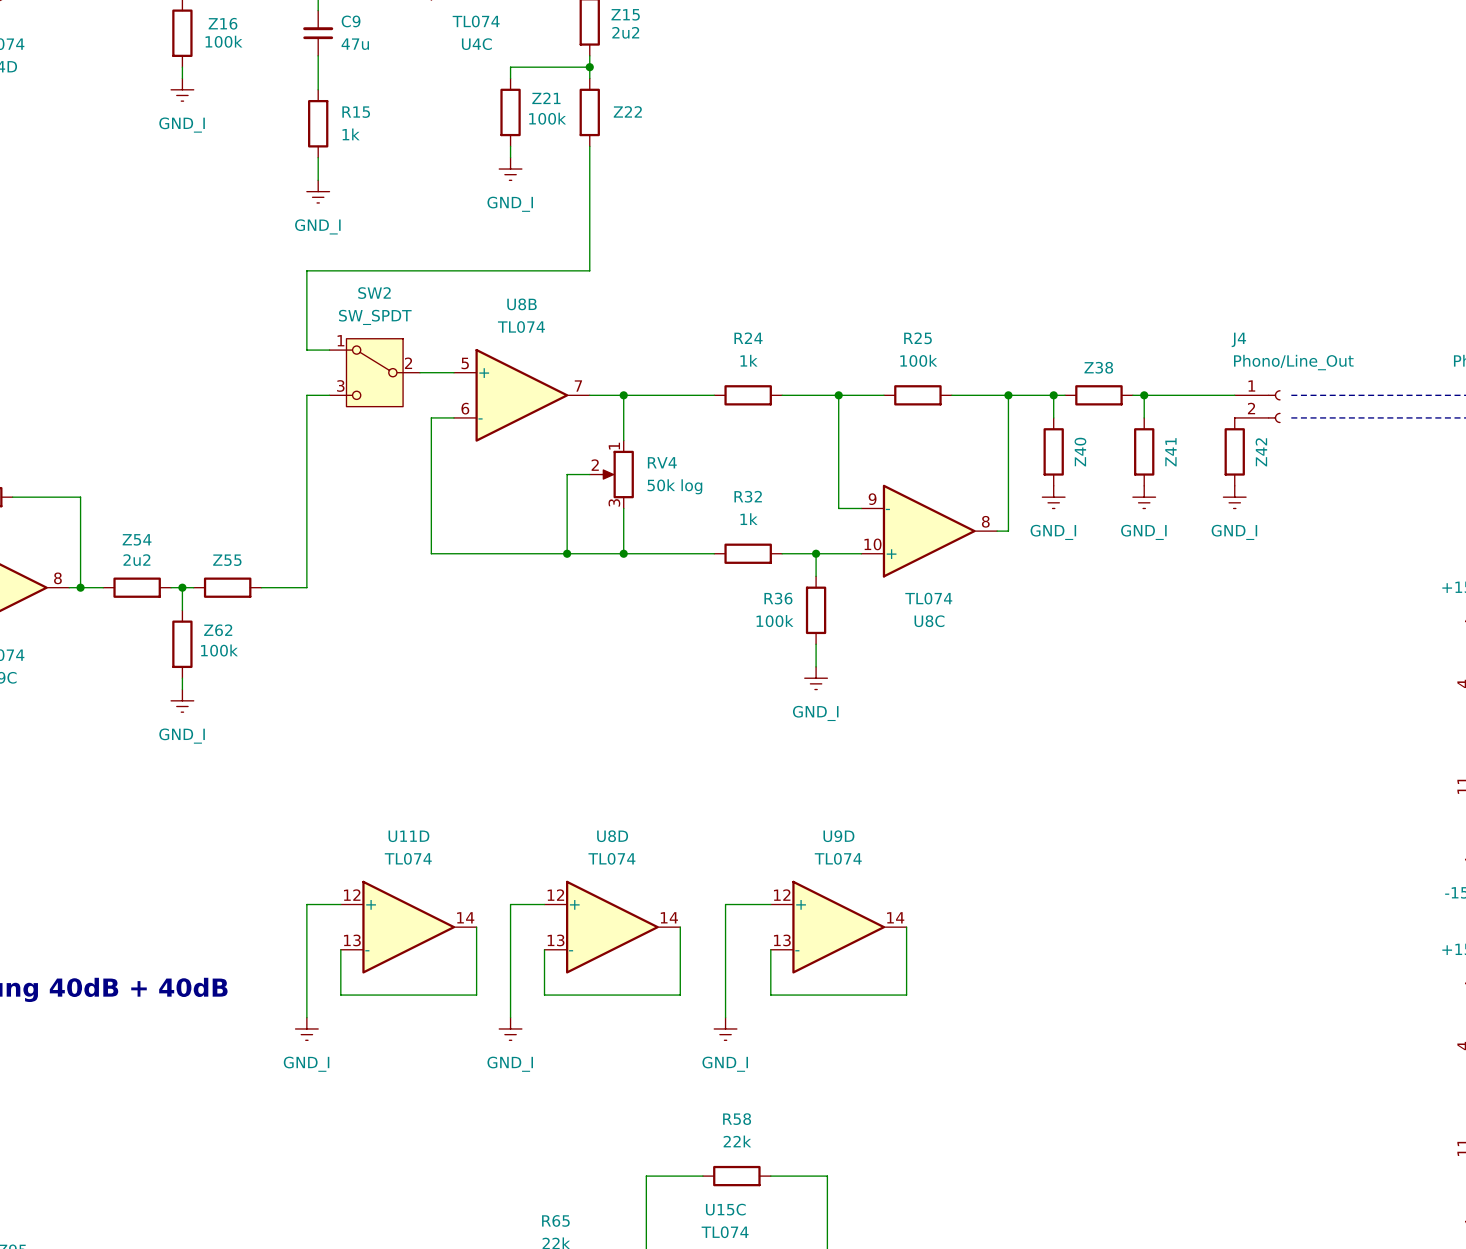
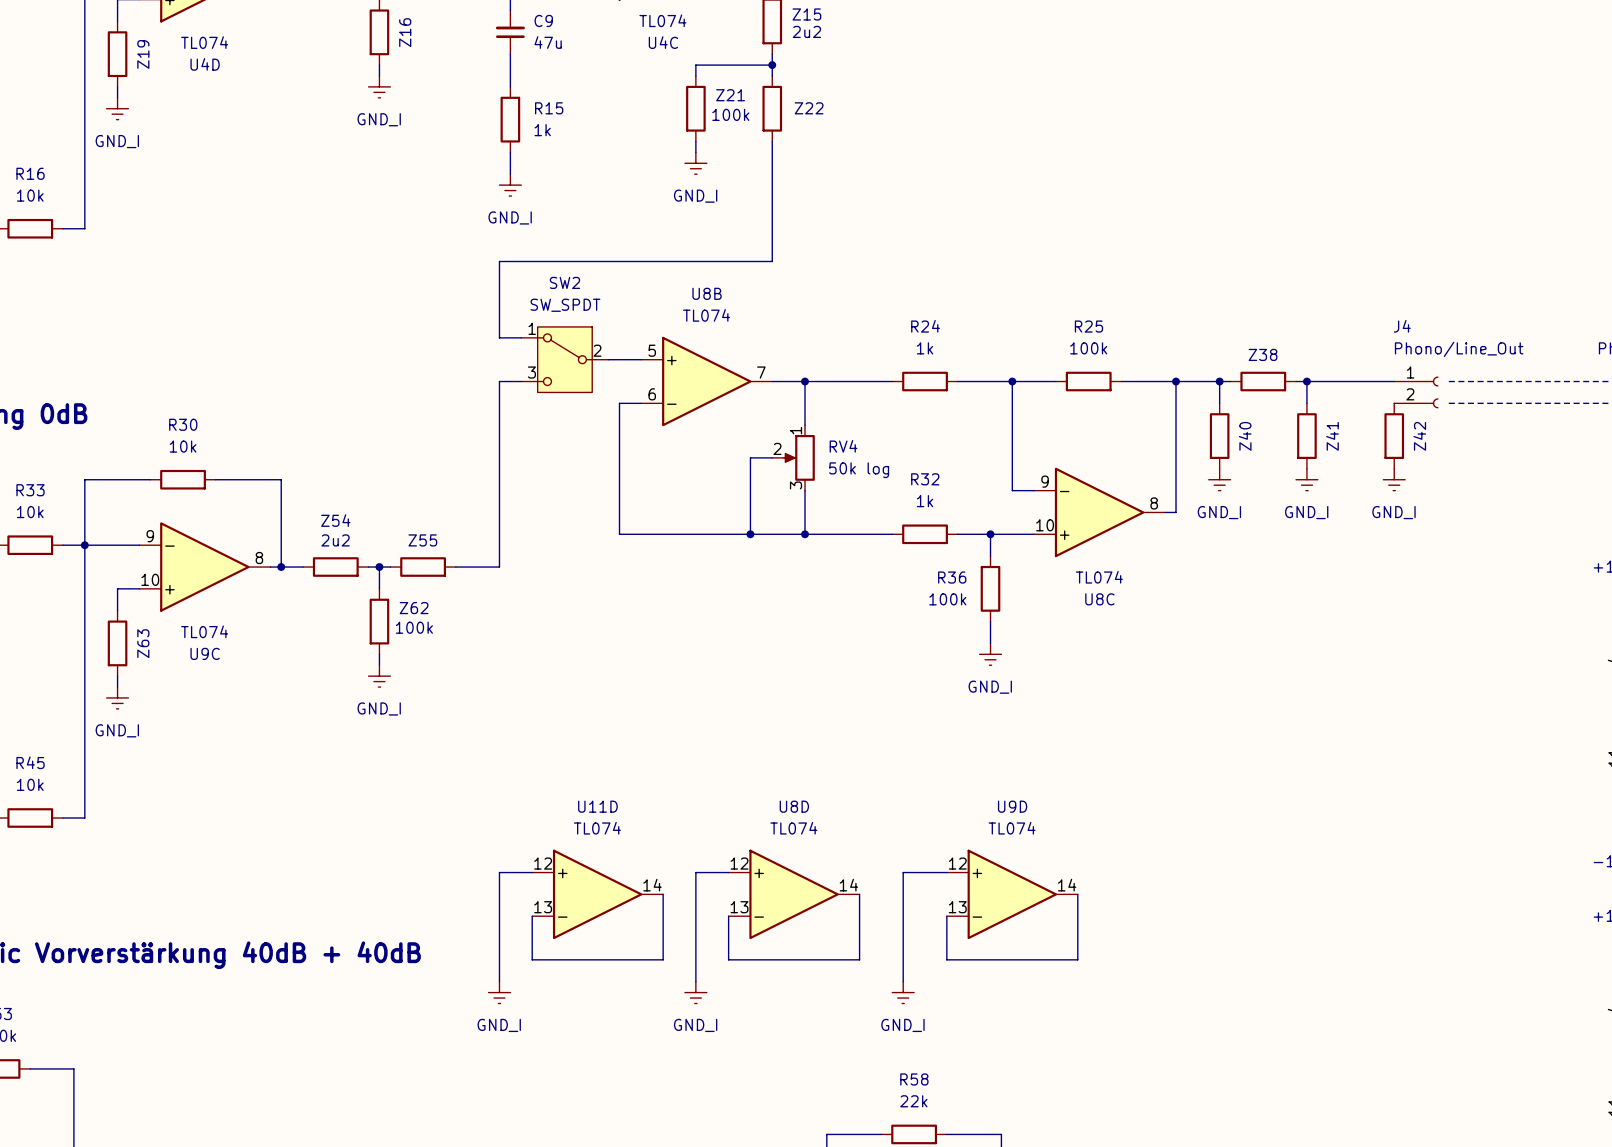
Z16 name rotation: 0° (223, 23) -> 90° counterclockwise (405, 32)
Z16 value: 100k (223, 41) -> none

